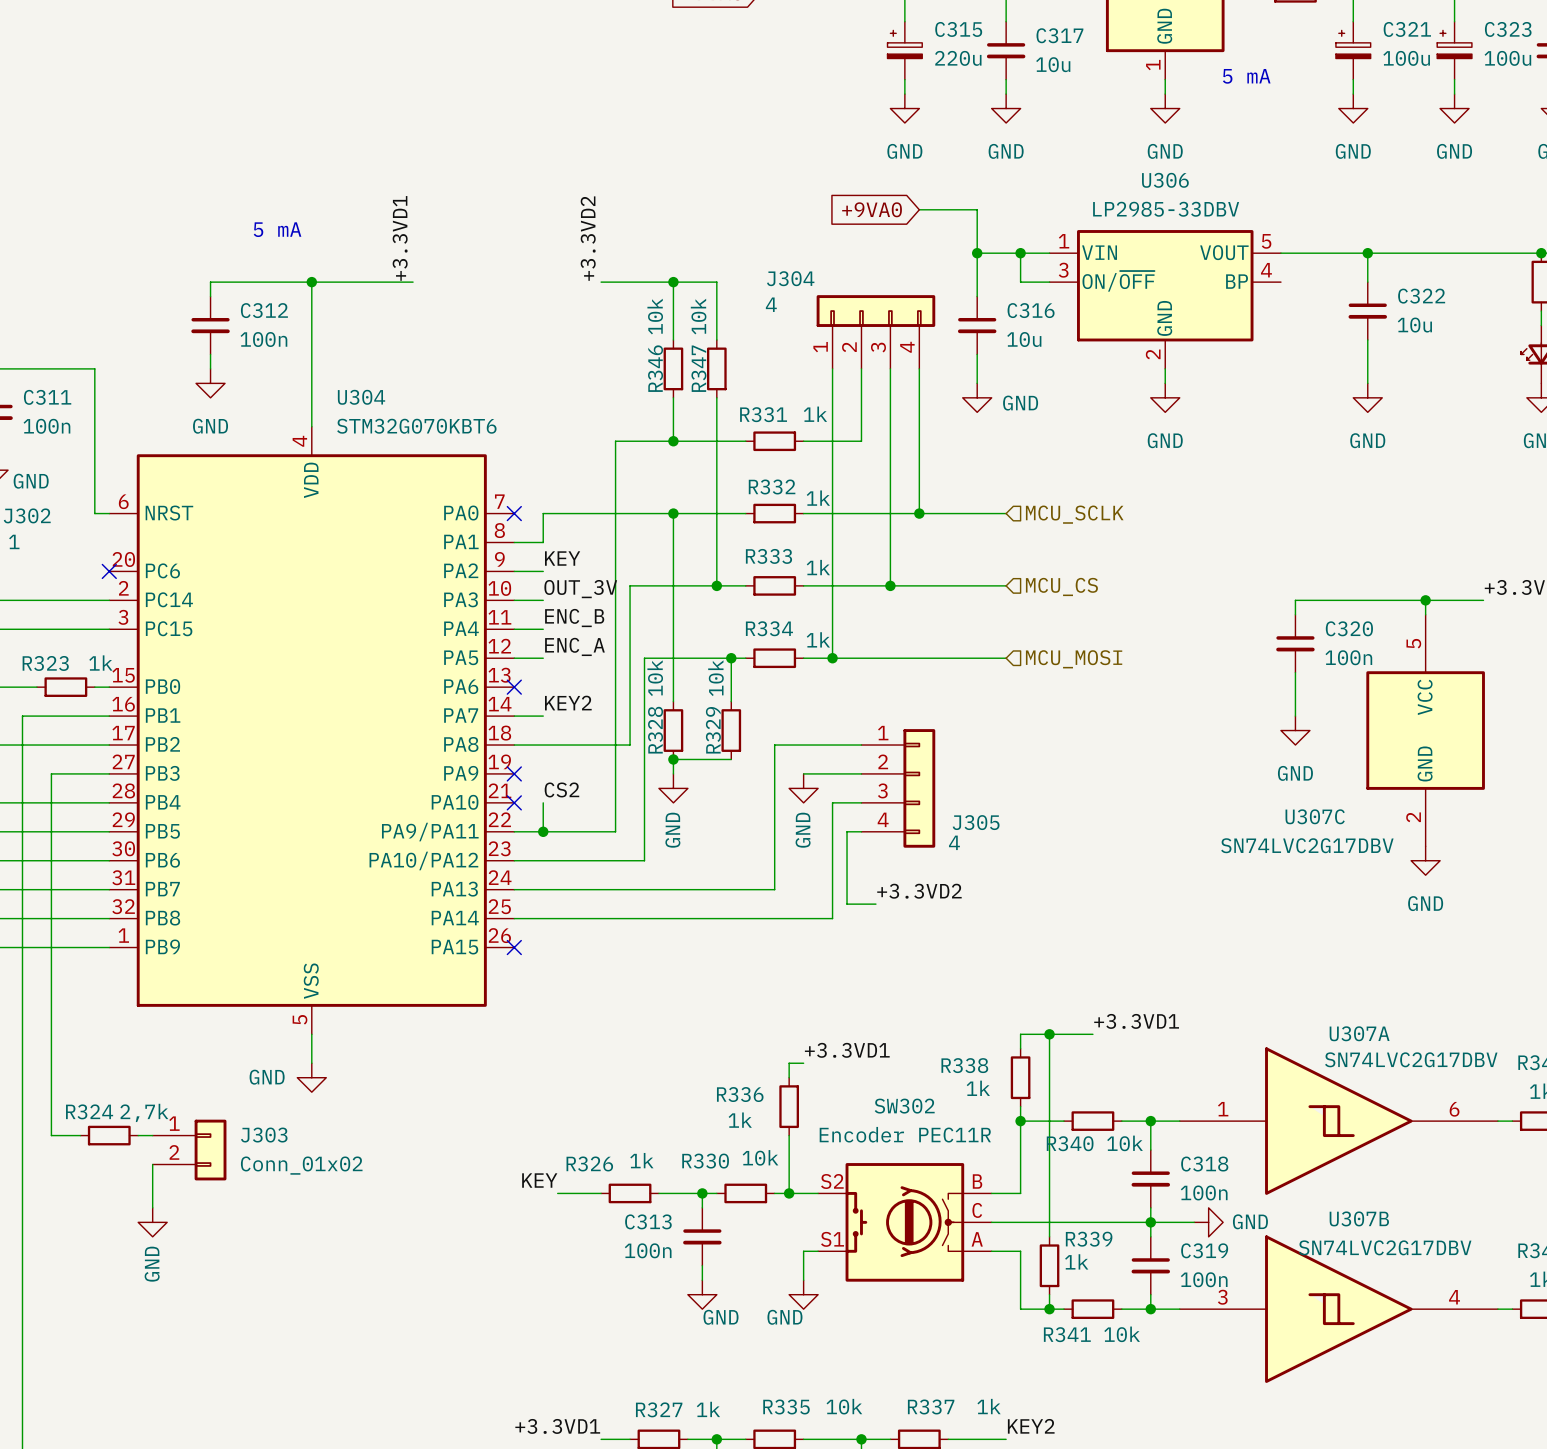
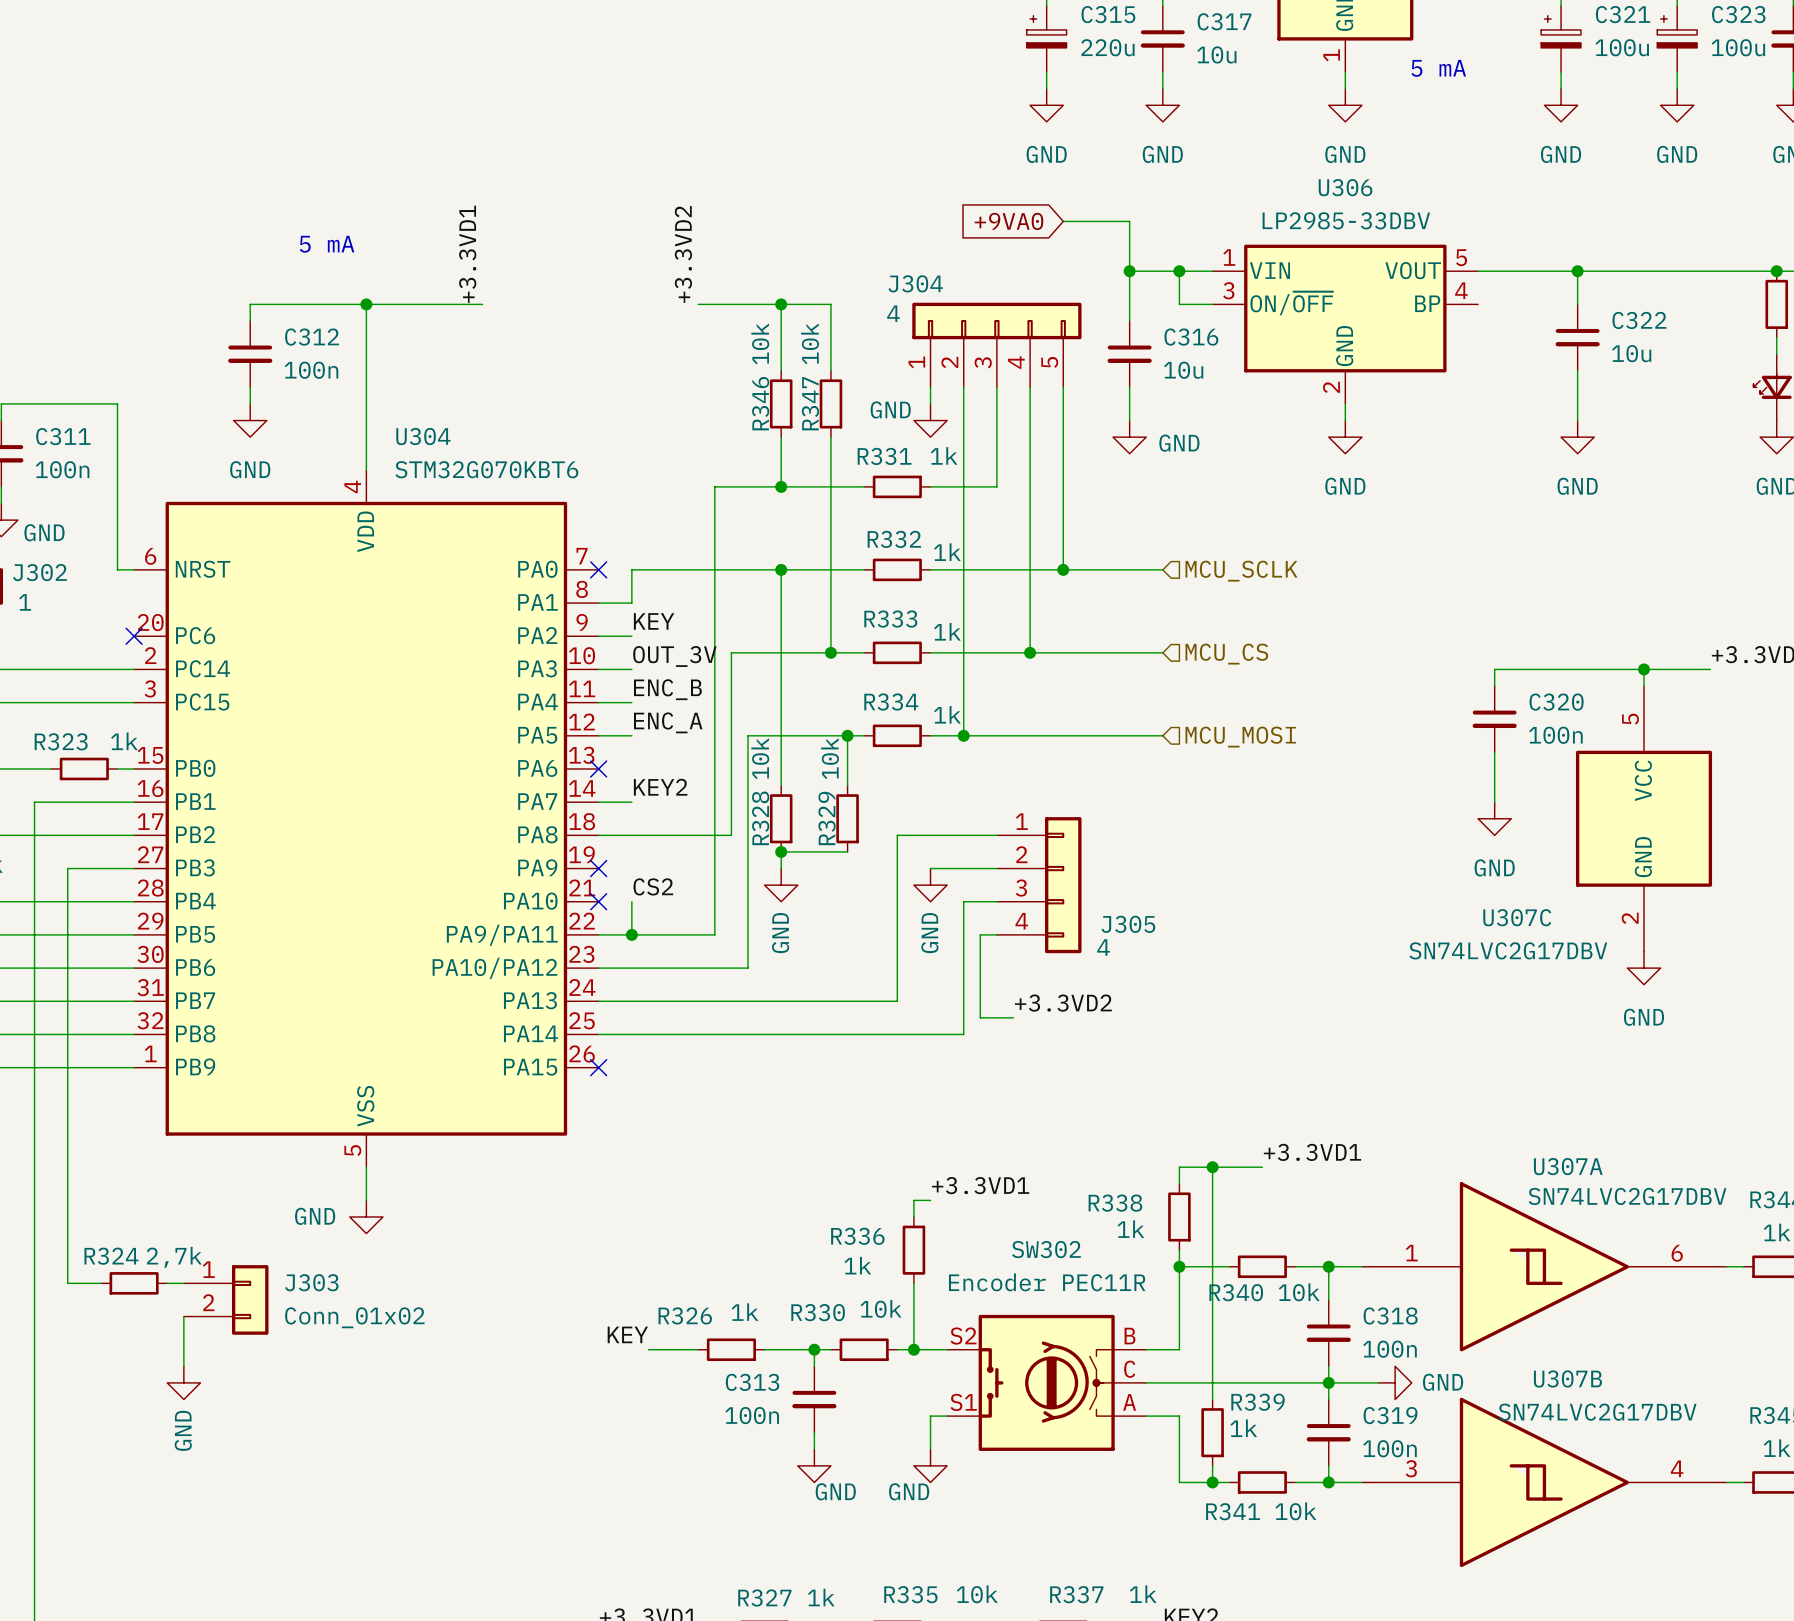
J304 symbol: [816, 295, 936, 369] -> [912, 302, 1082, 388]
wire: none -> (930, 387) (930, 403)
power symbol: none -> GND (930, 420)

